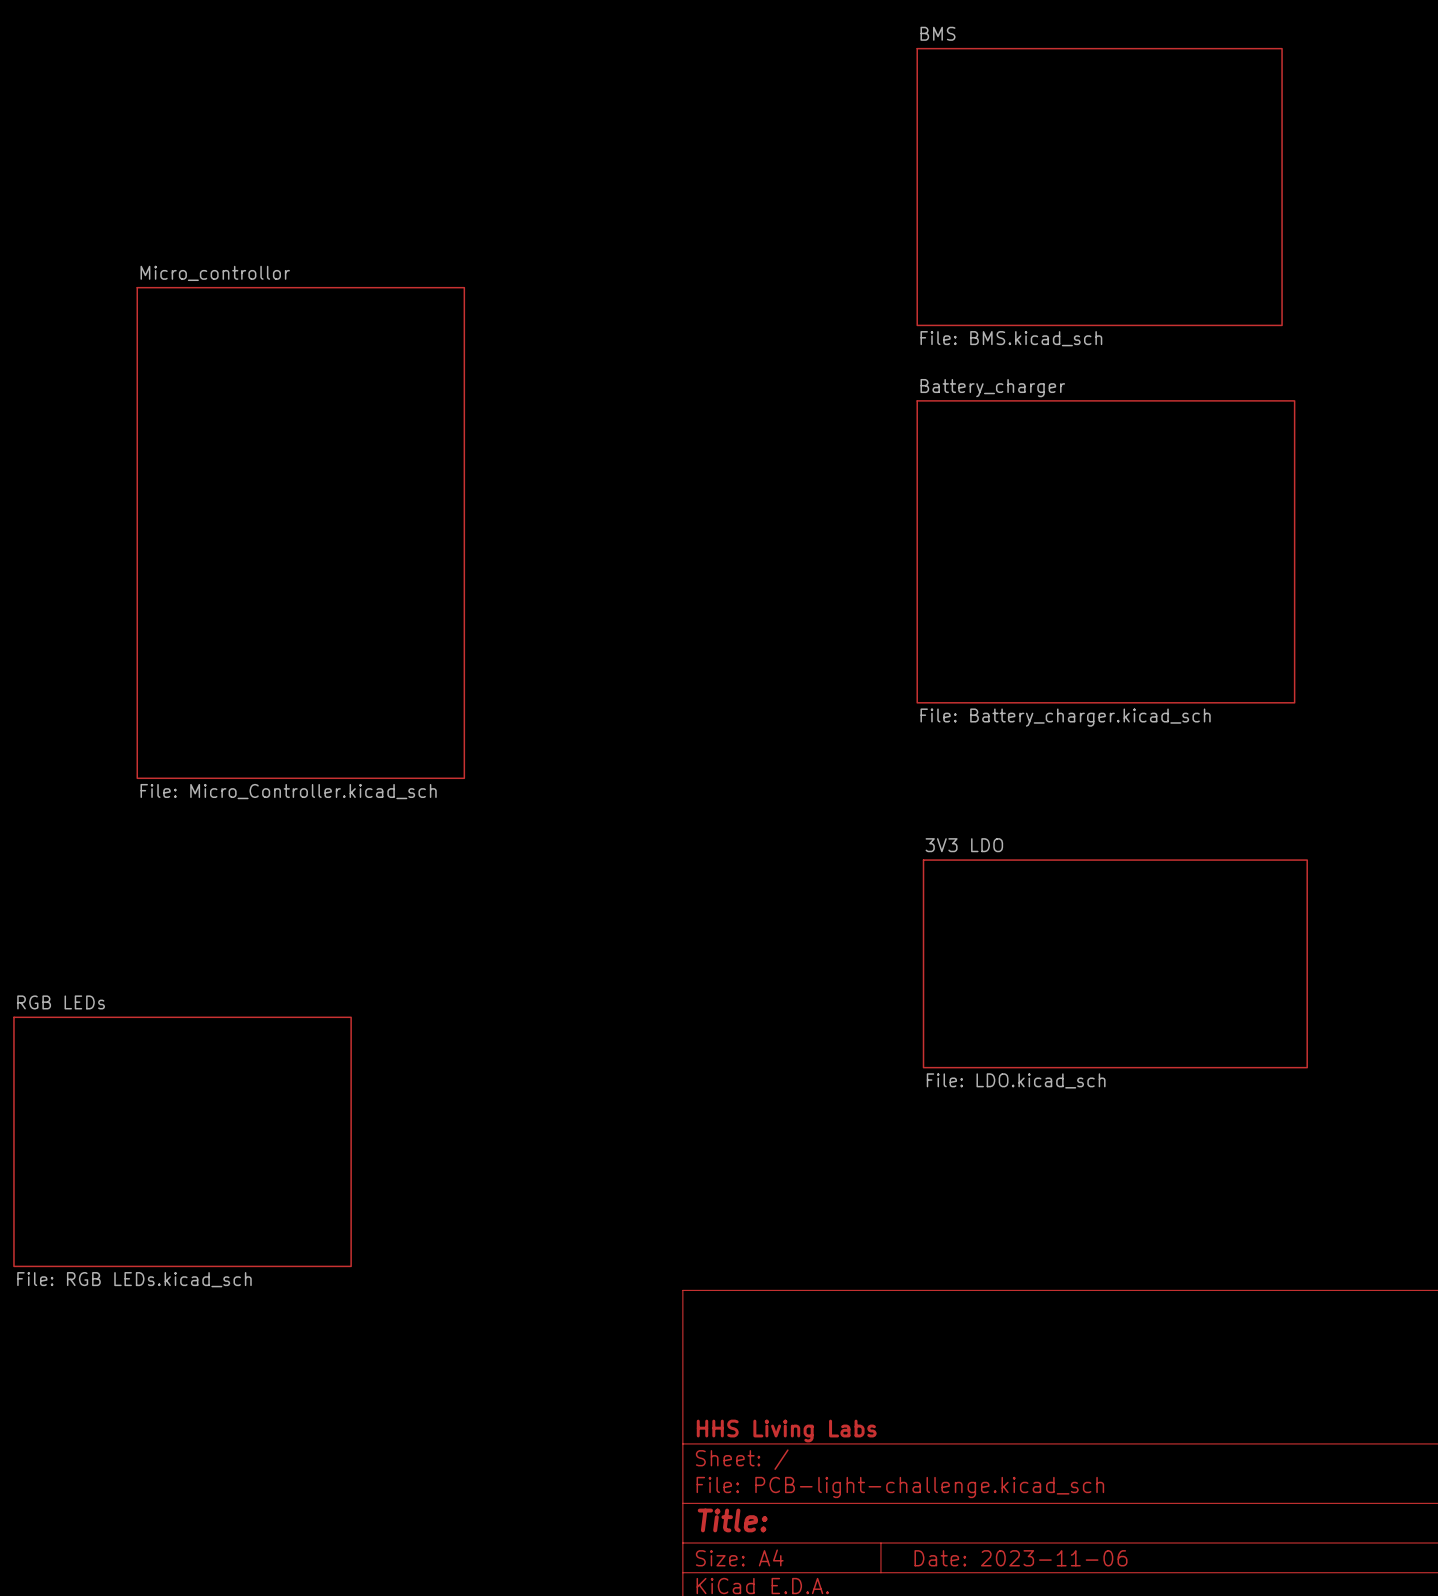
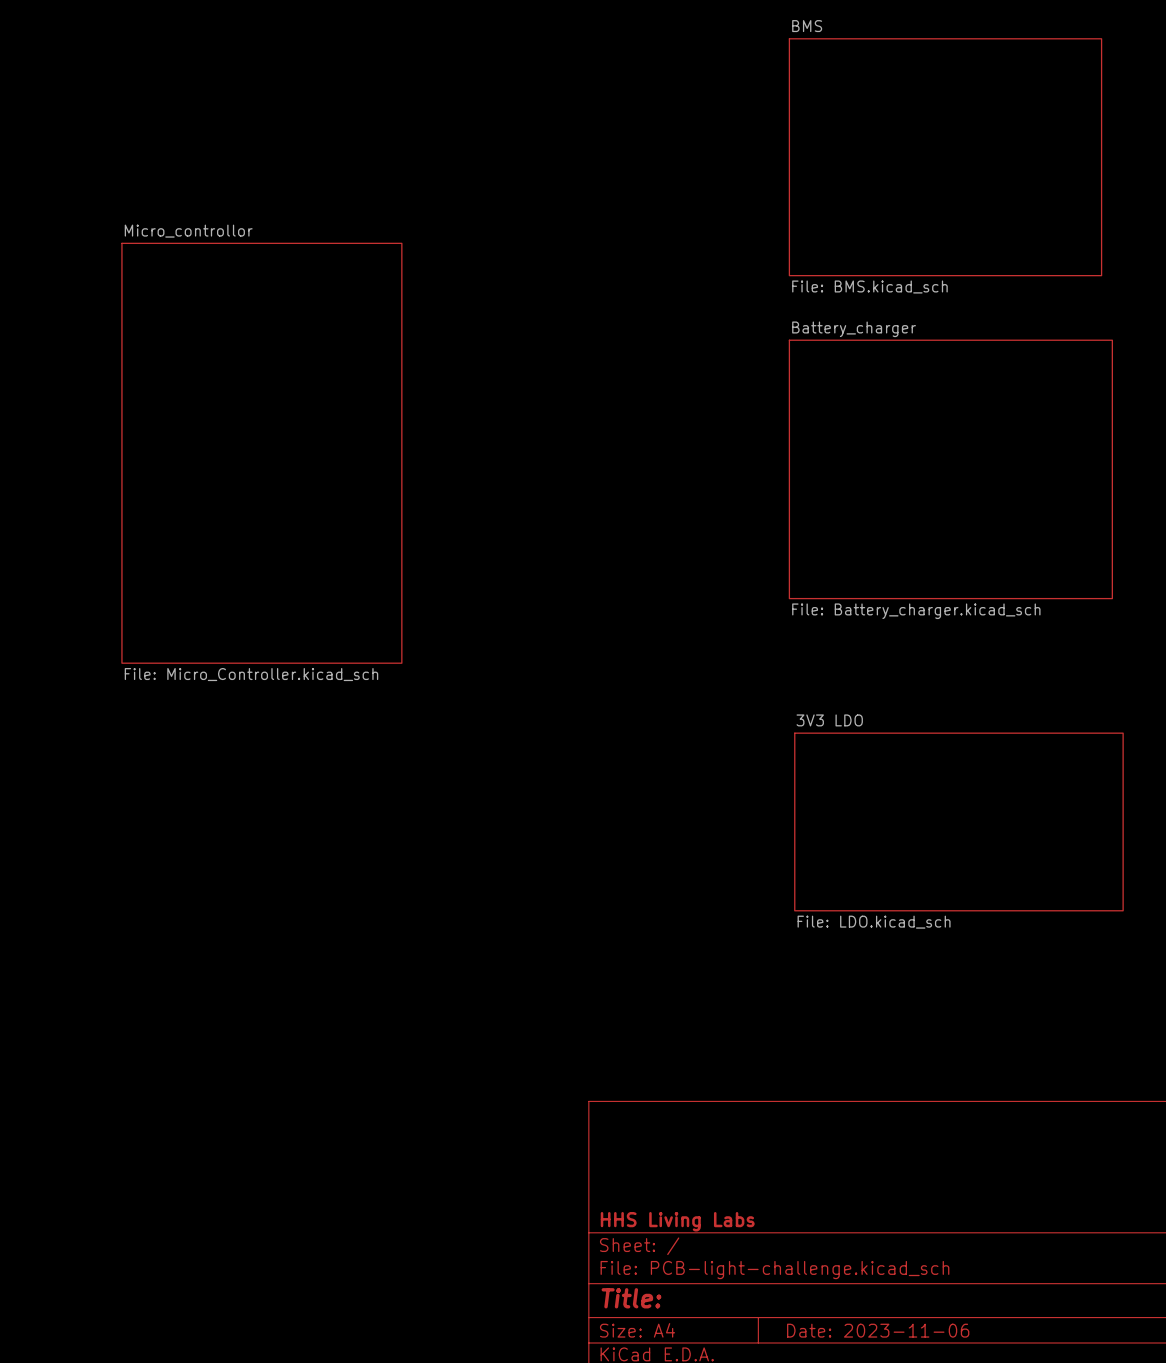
sheet RGB LEDs: File: RGB LEDs.kicad_sch (182, 1141) -> none

